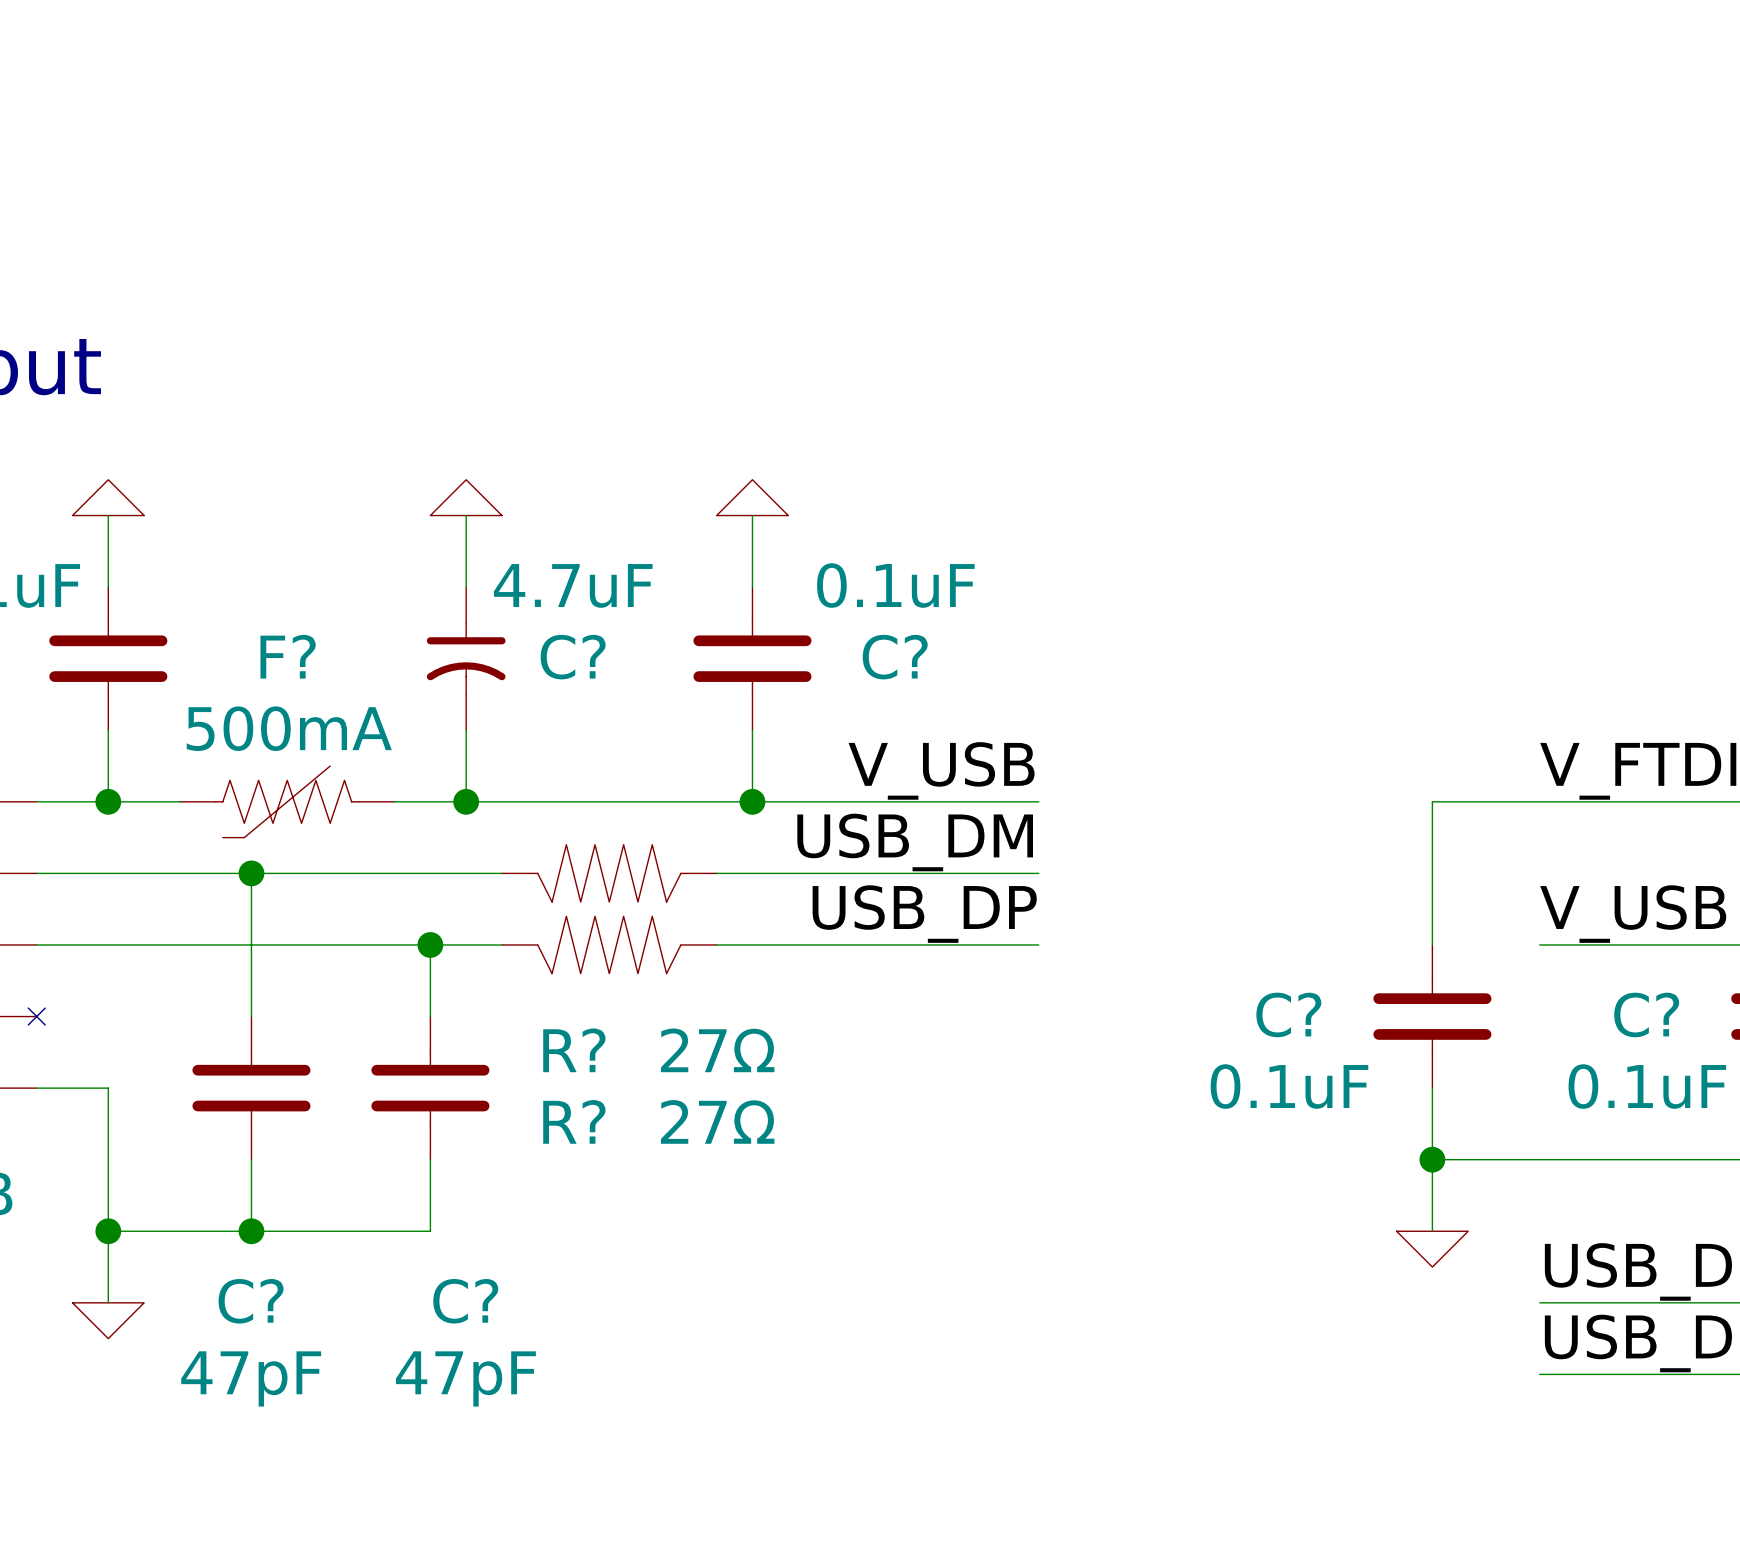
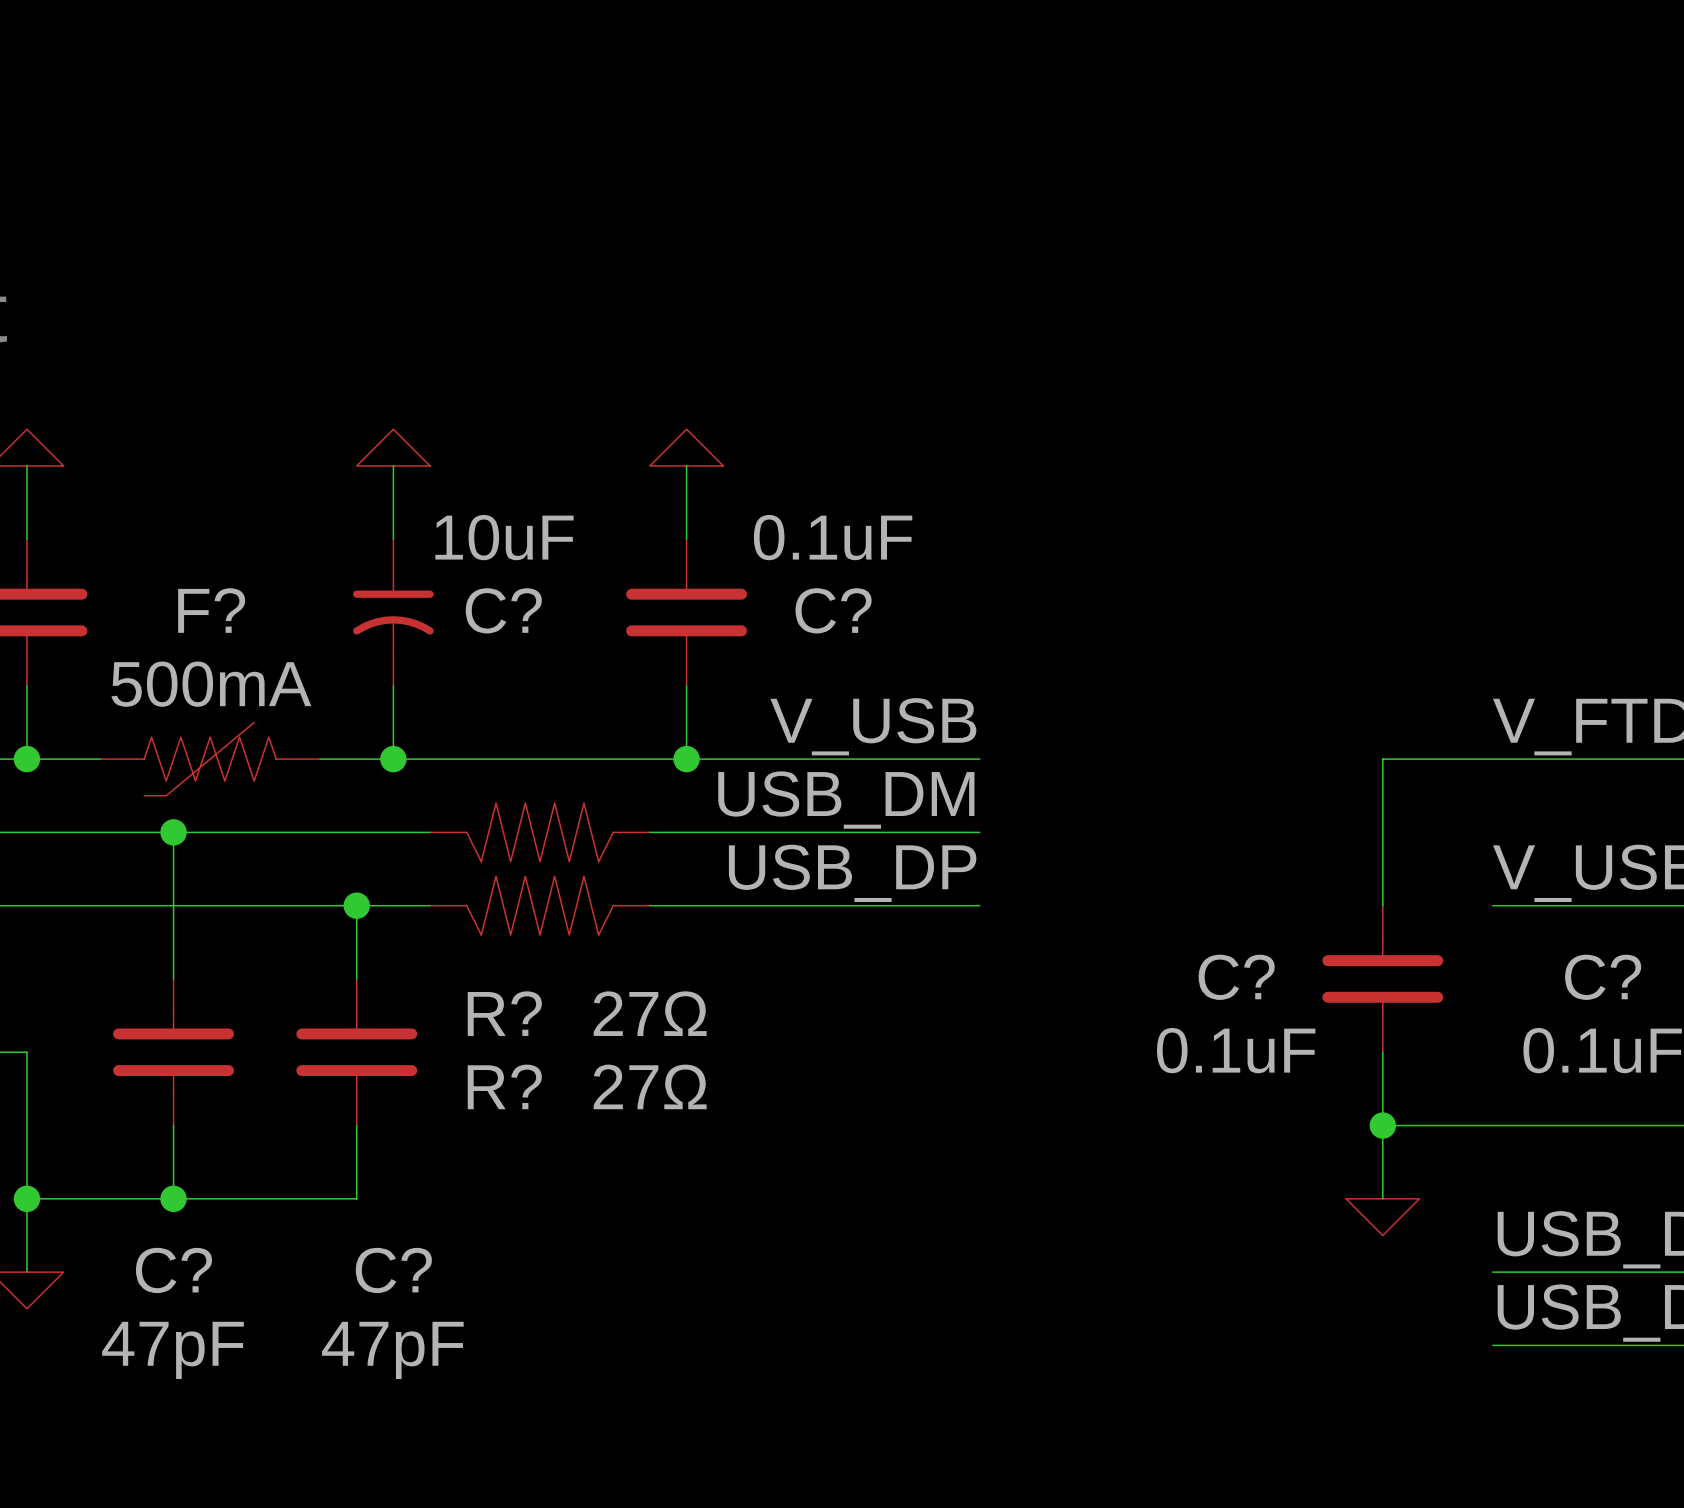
C? value: 4.7uF (573, 585) -> 10uF (504, 537)

